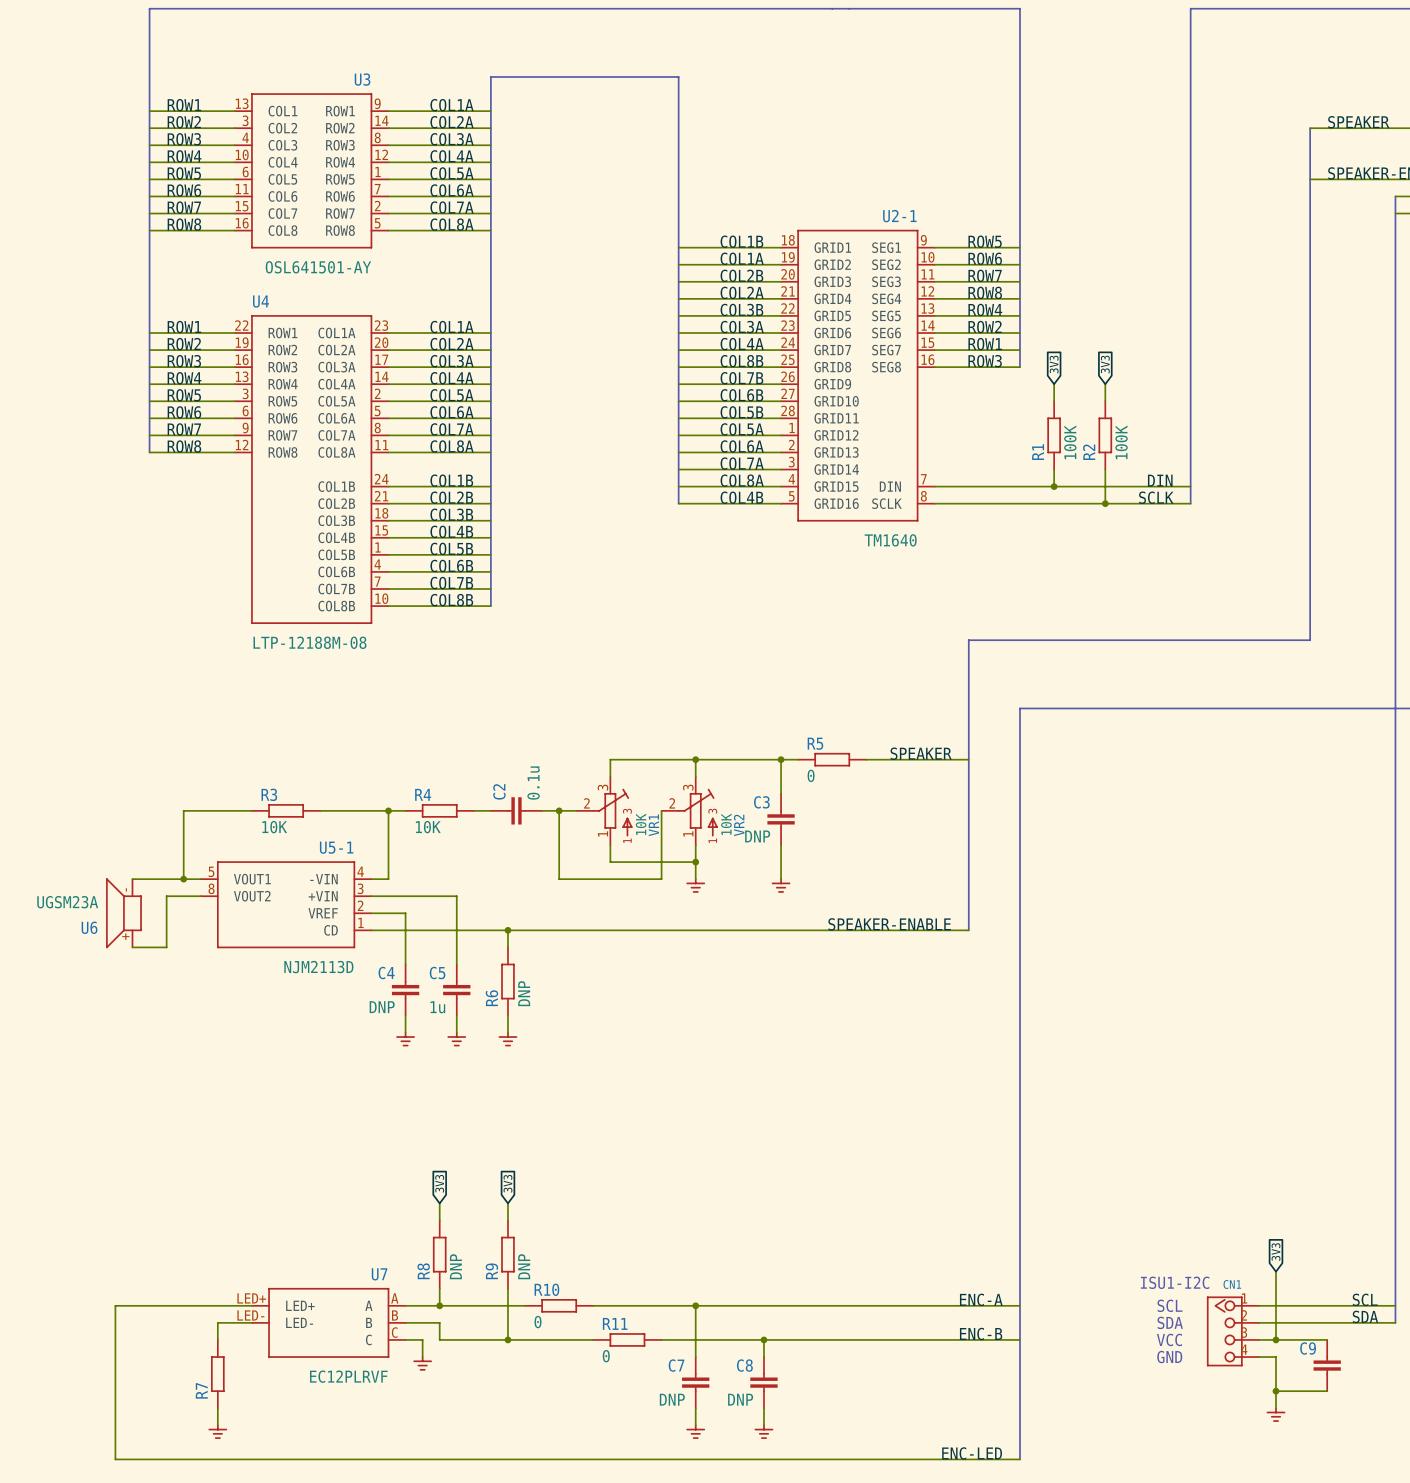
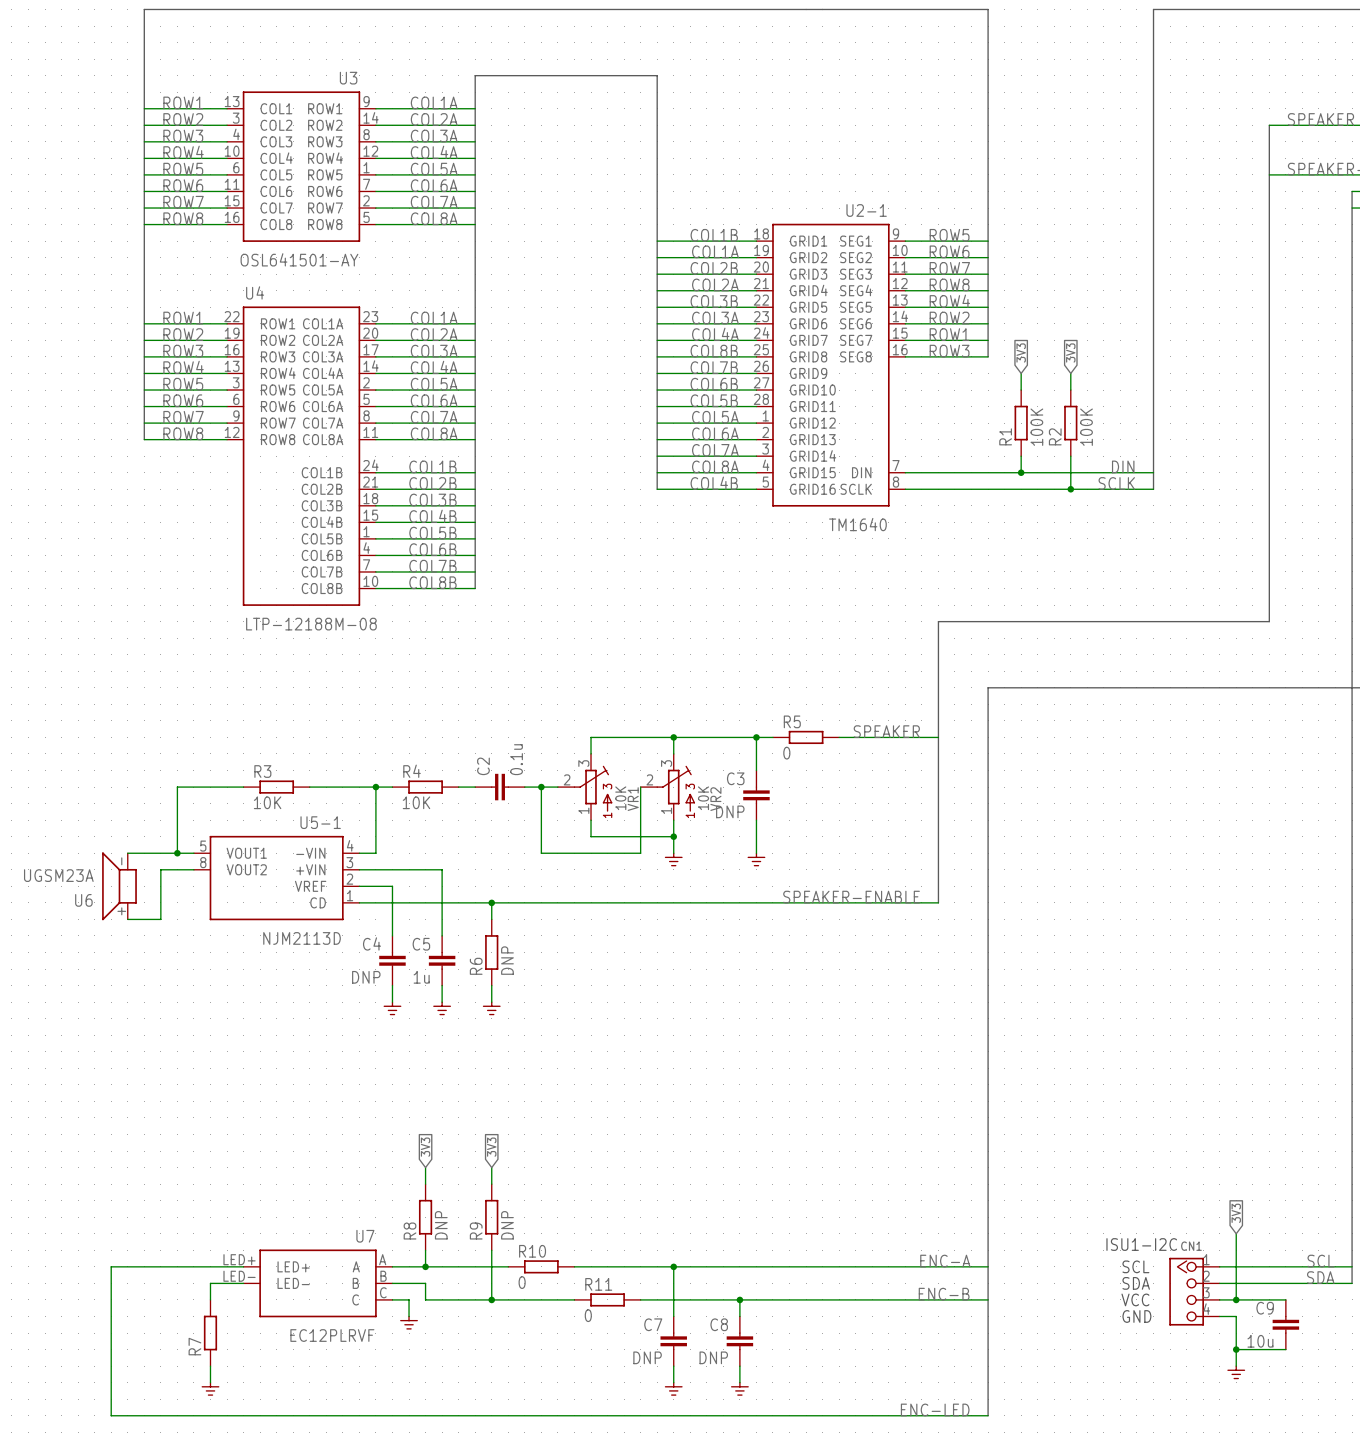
C9 value: none -> 10u (1260, 1341)

